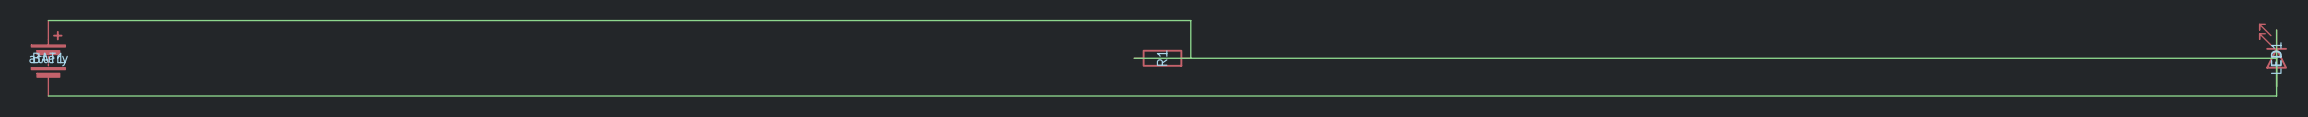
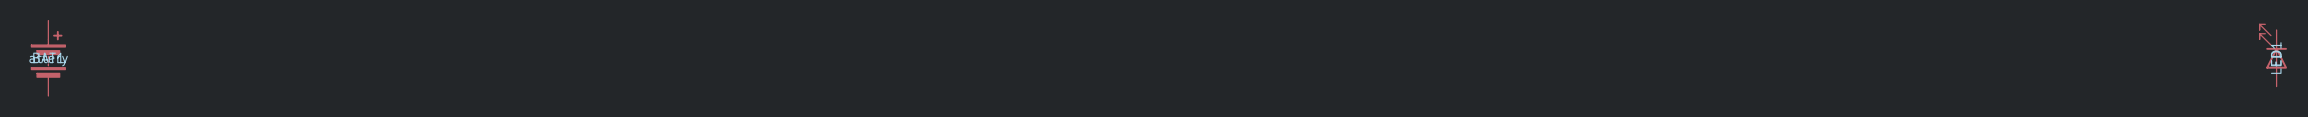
wire: (48, 20) (1190, 20) (1190, 58) -> none
wire: (2276, 29) (2276, 96) (48, 96) -> none
wire: (1134, 58) (2276, 58) -> none
R1: (1162, 58) -> none

